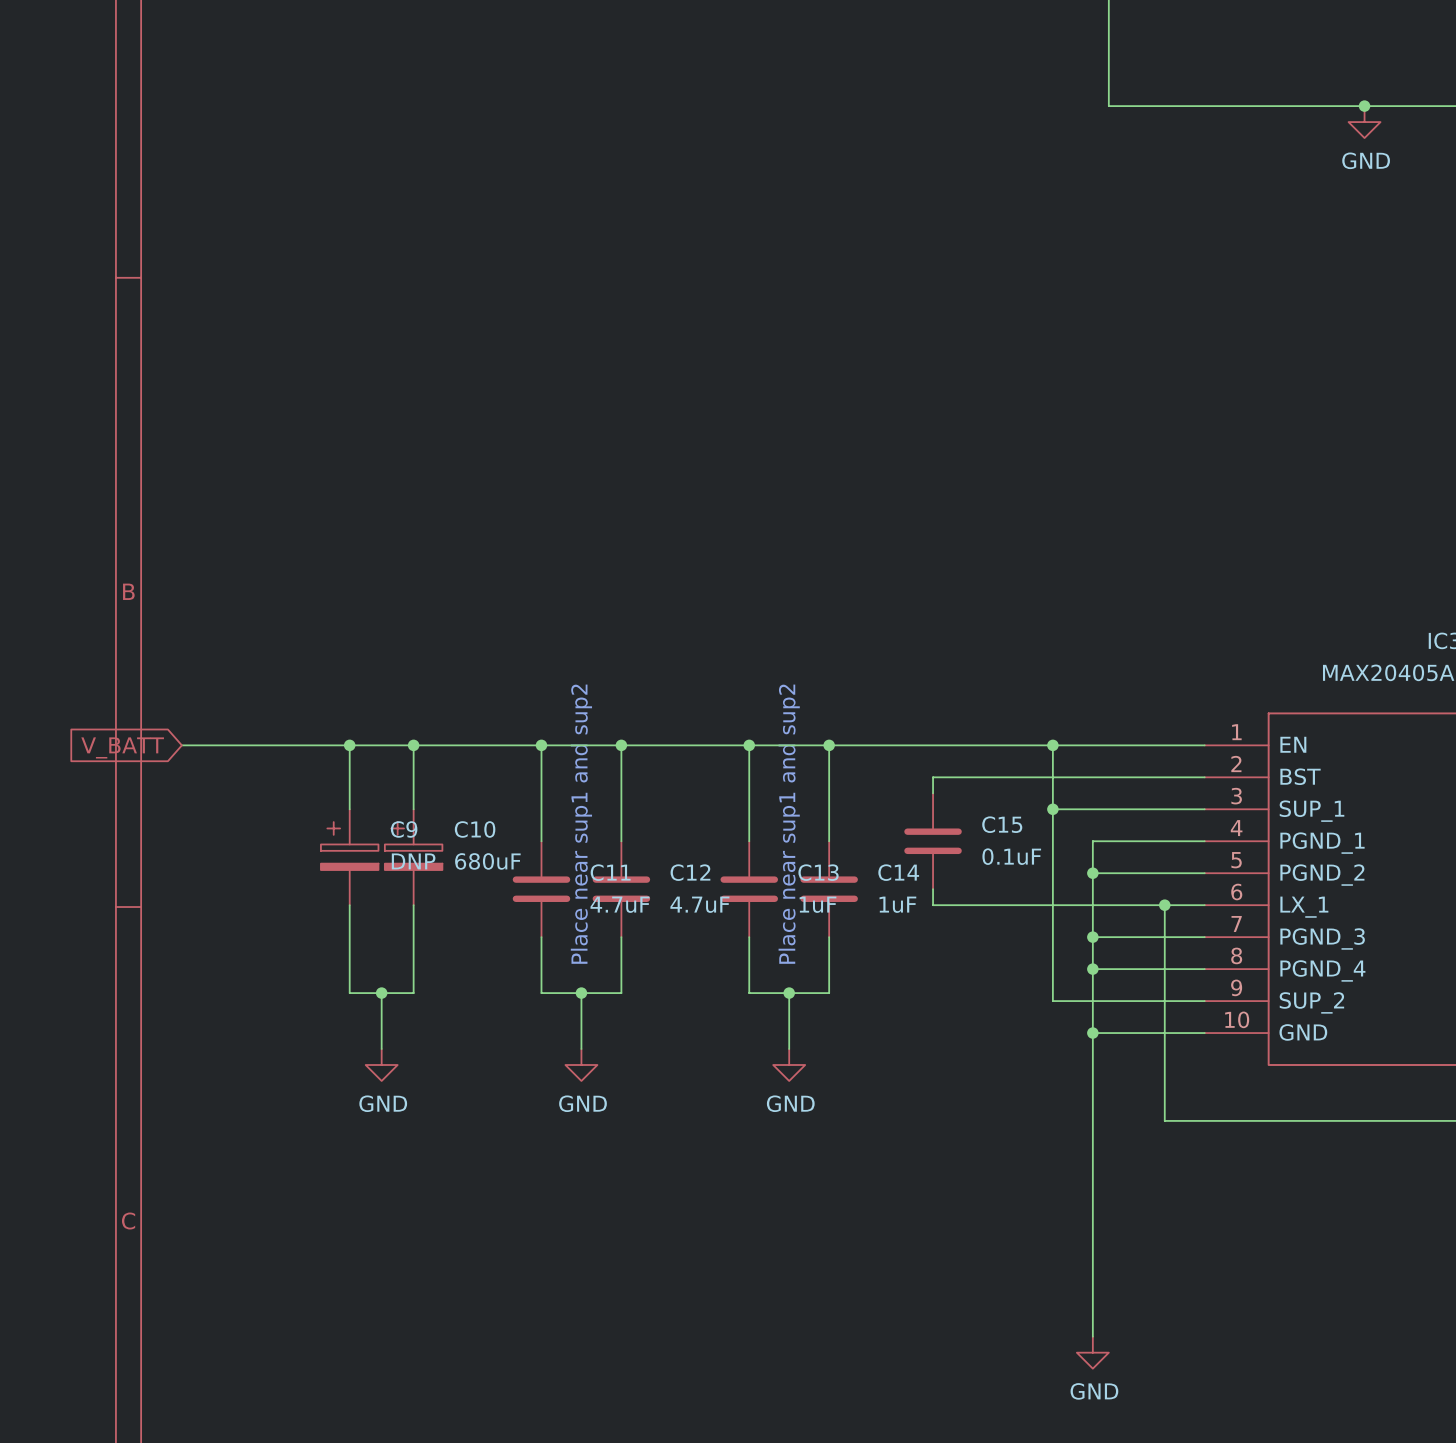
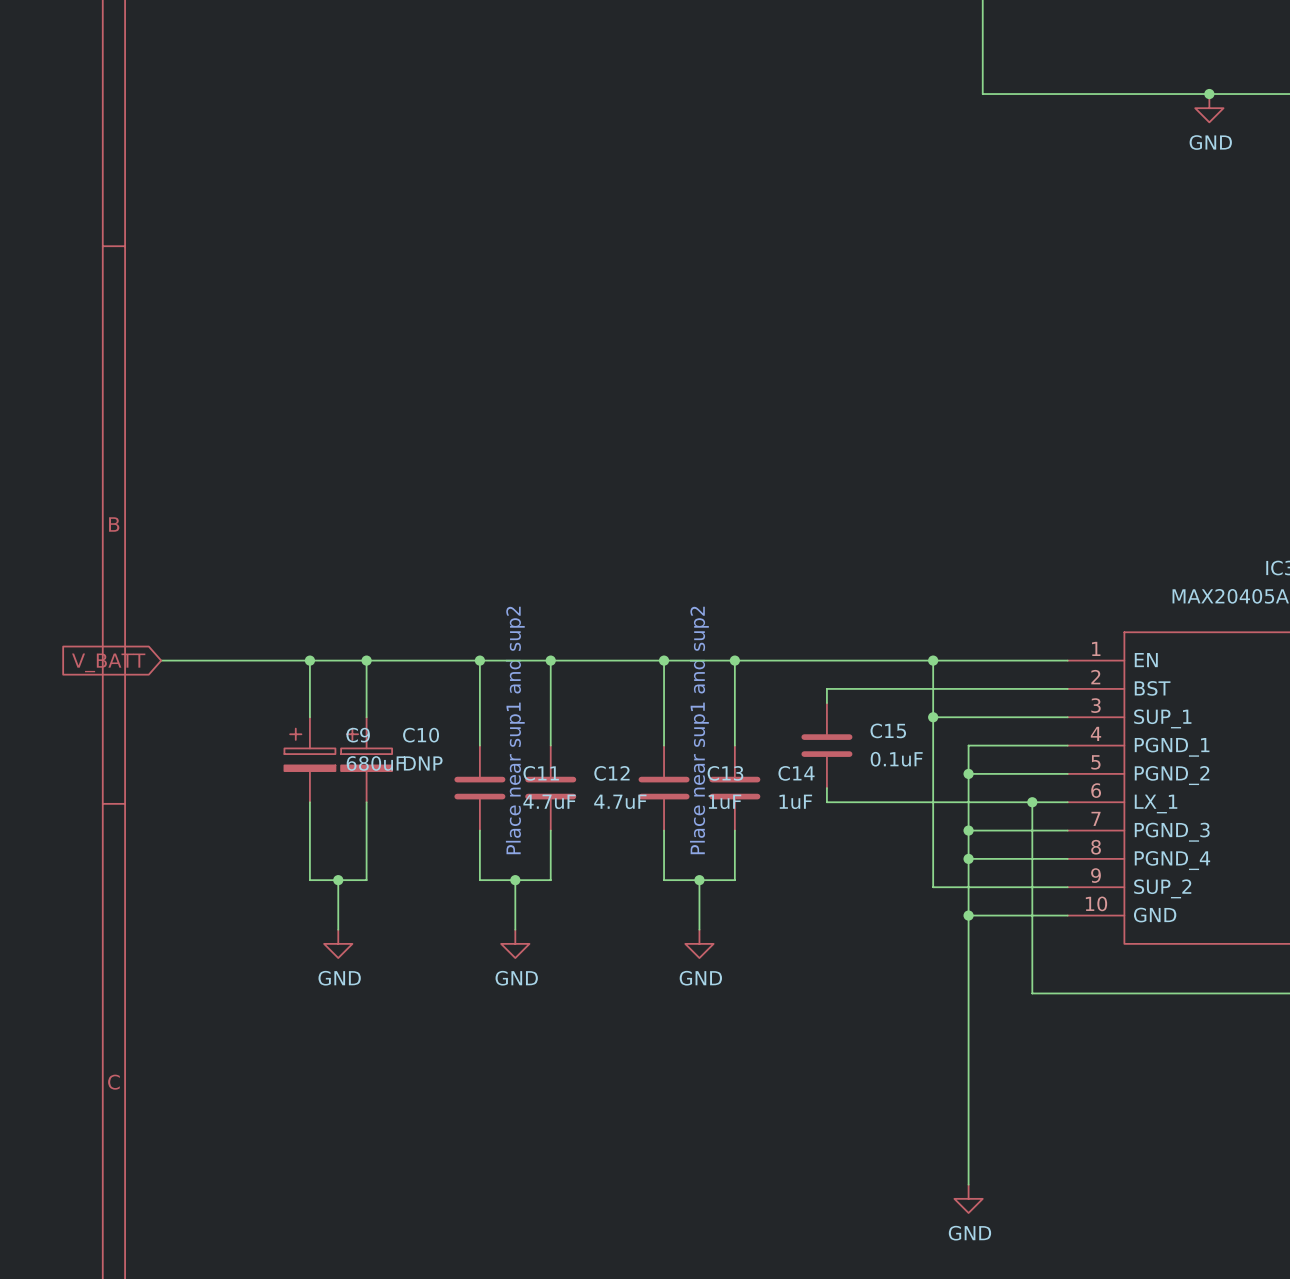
C9 value: DNP (413, 861) -> 680uF (375, 763)
C10 value: 680uF (487, 861) -> DNP (423, 763)

